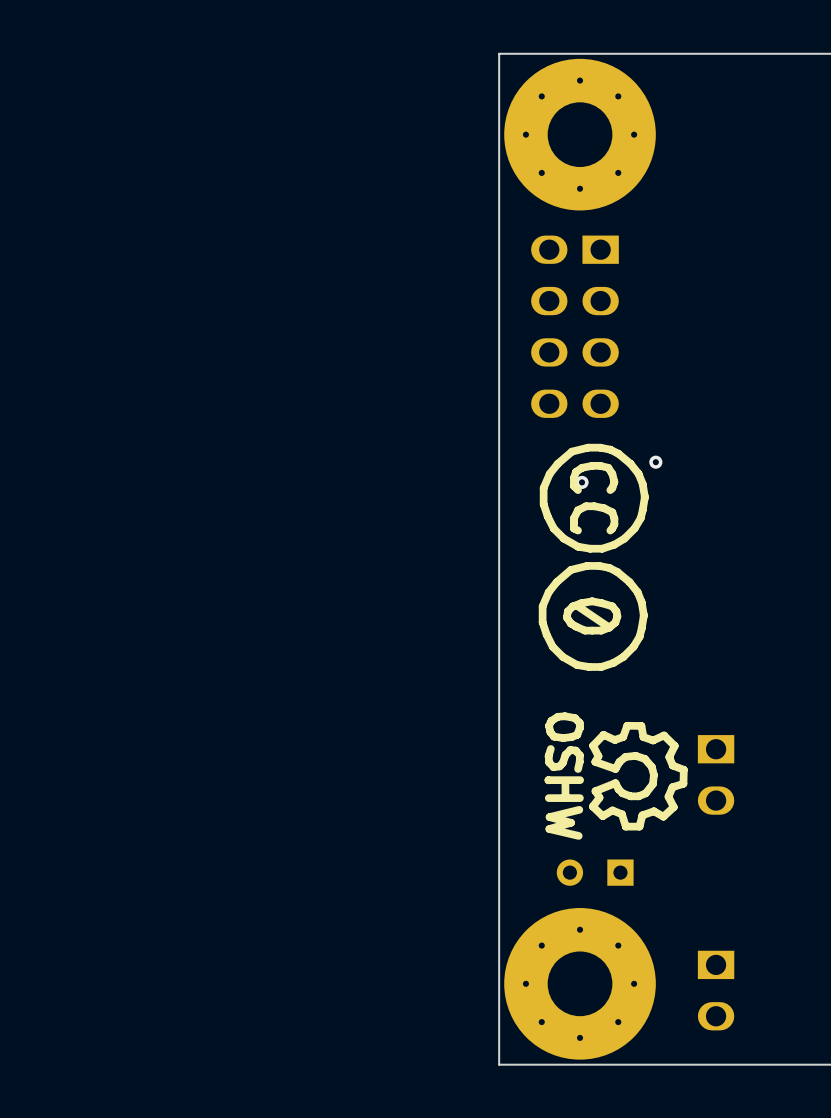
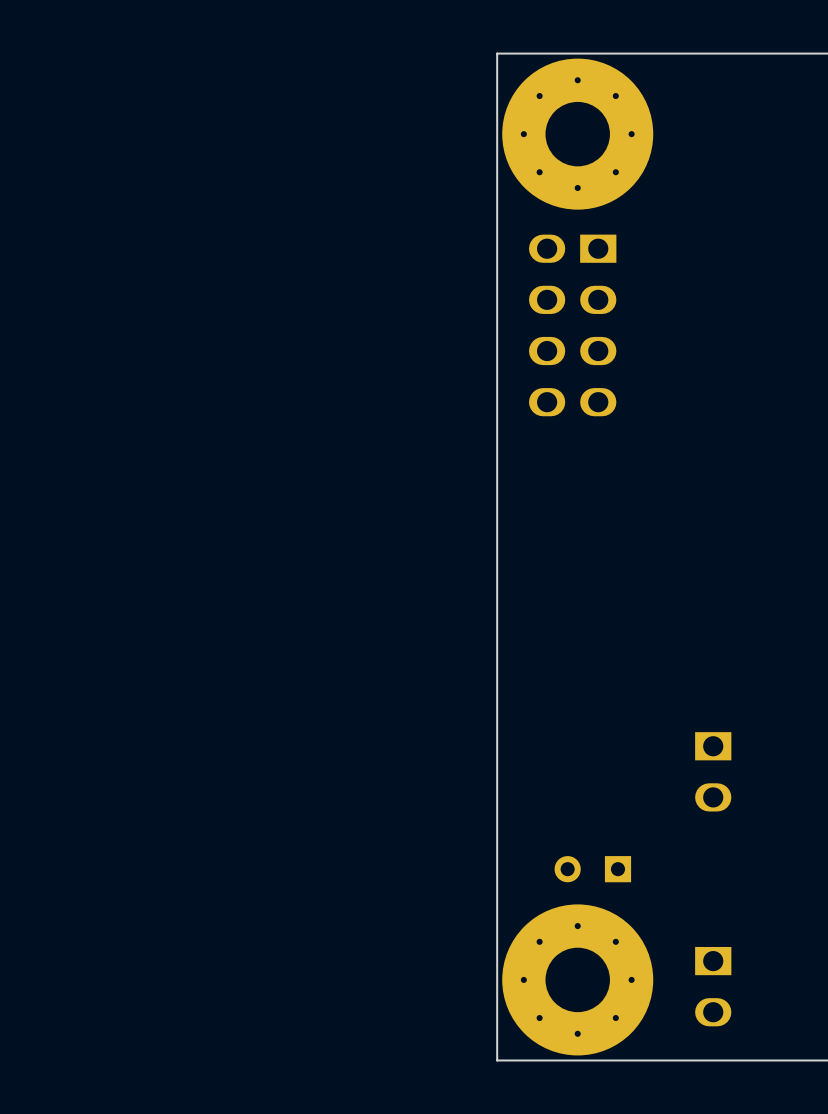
drawing: [538, 443, 649, 671] -> none
via: (655, 462) -> none
via: (582, 482) -> none
drawing: [544, 712, 688, 840] -> none

